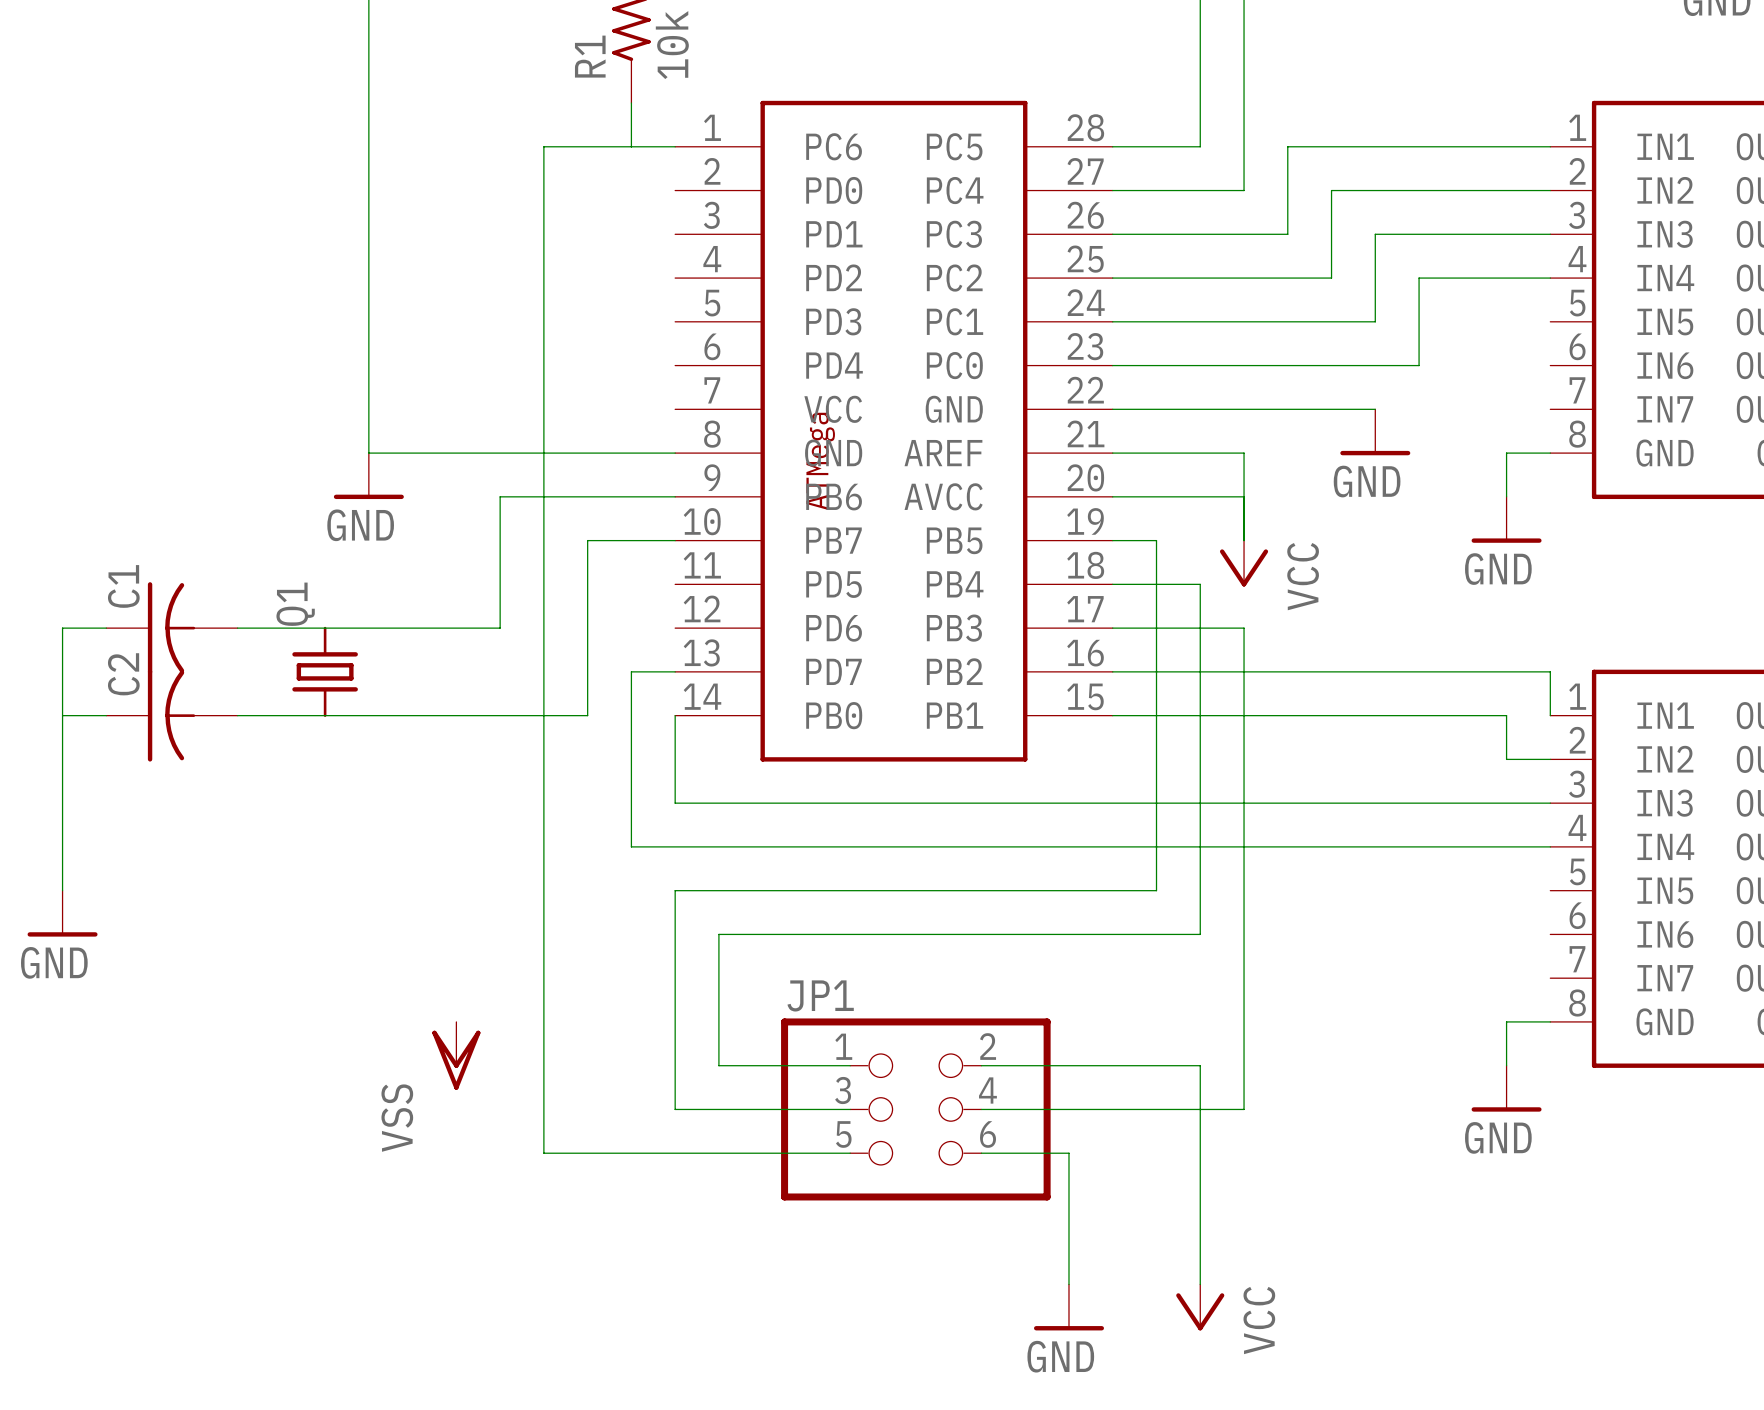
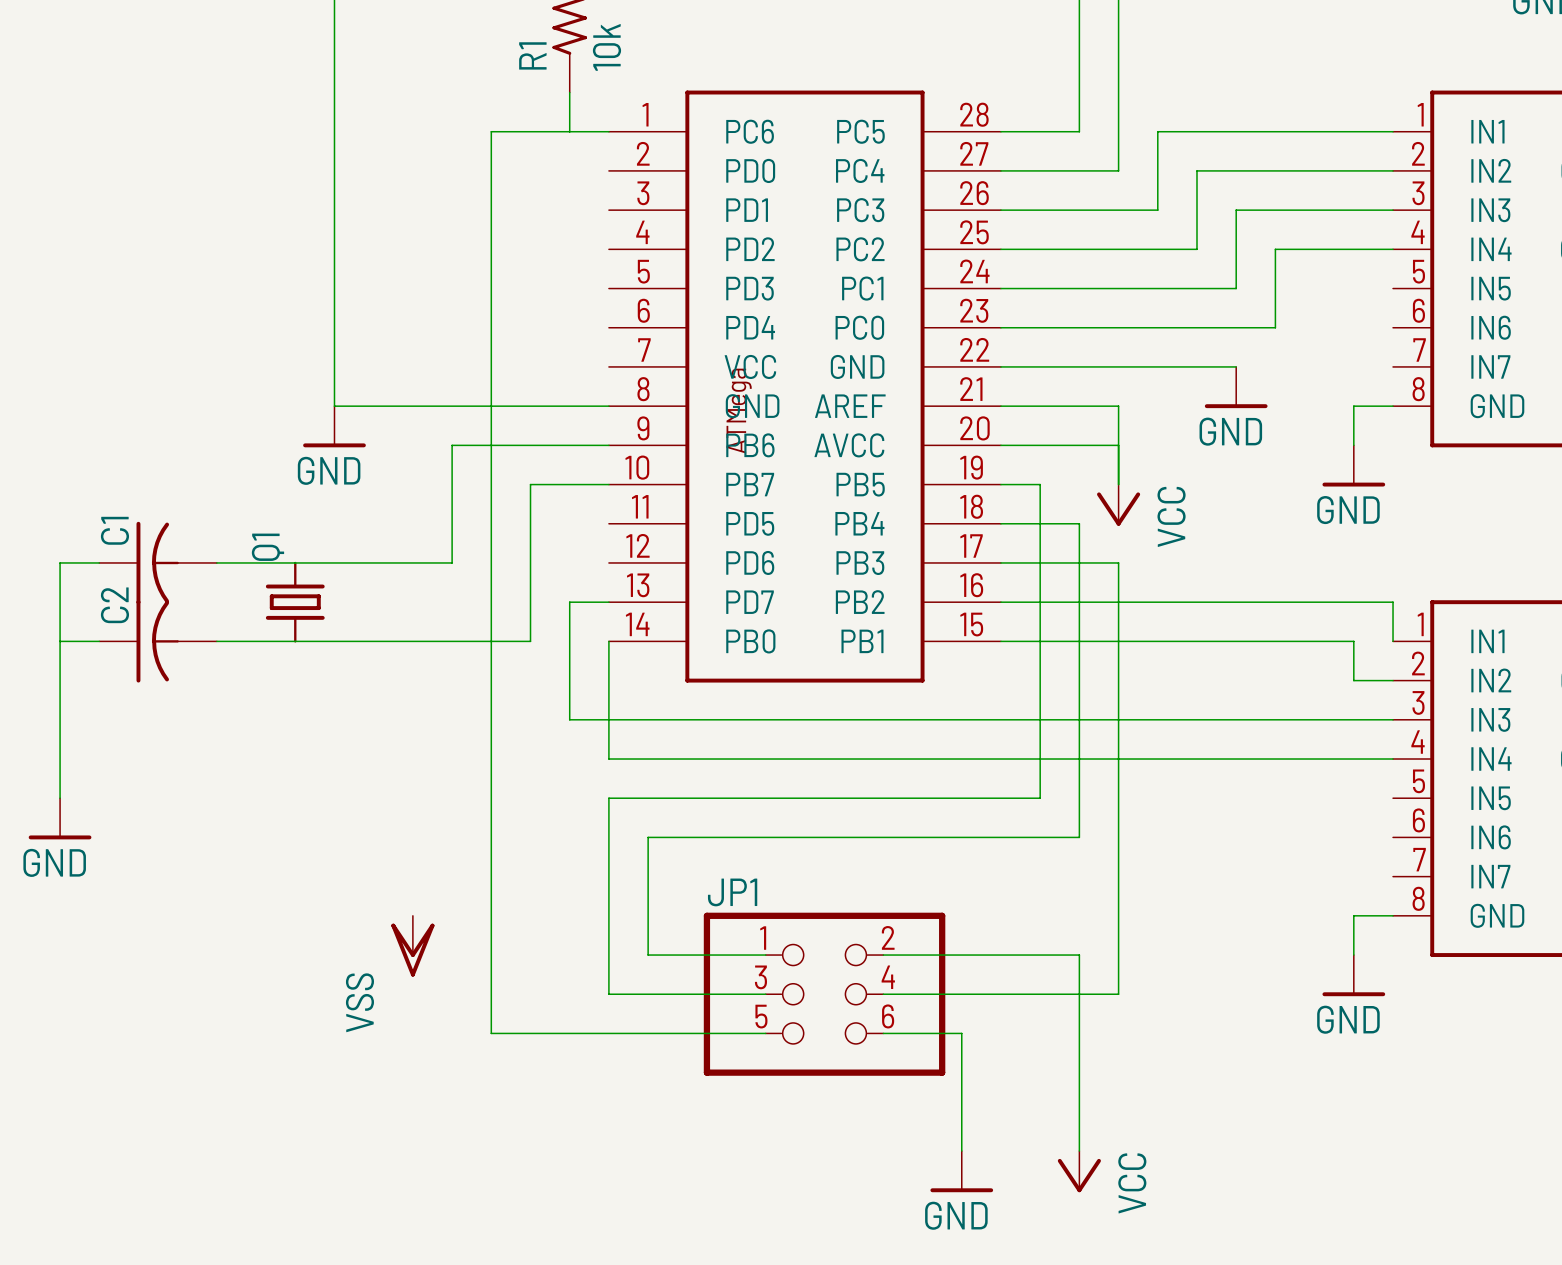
wire: (631, 803) (631, 846) (675, 846) -> (569, 719) (608, 719) (608, 759)

